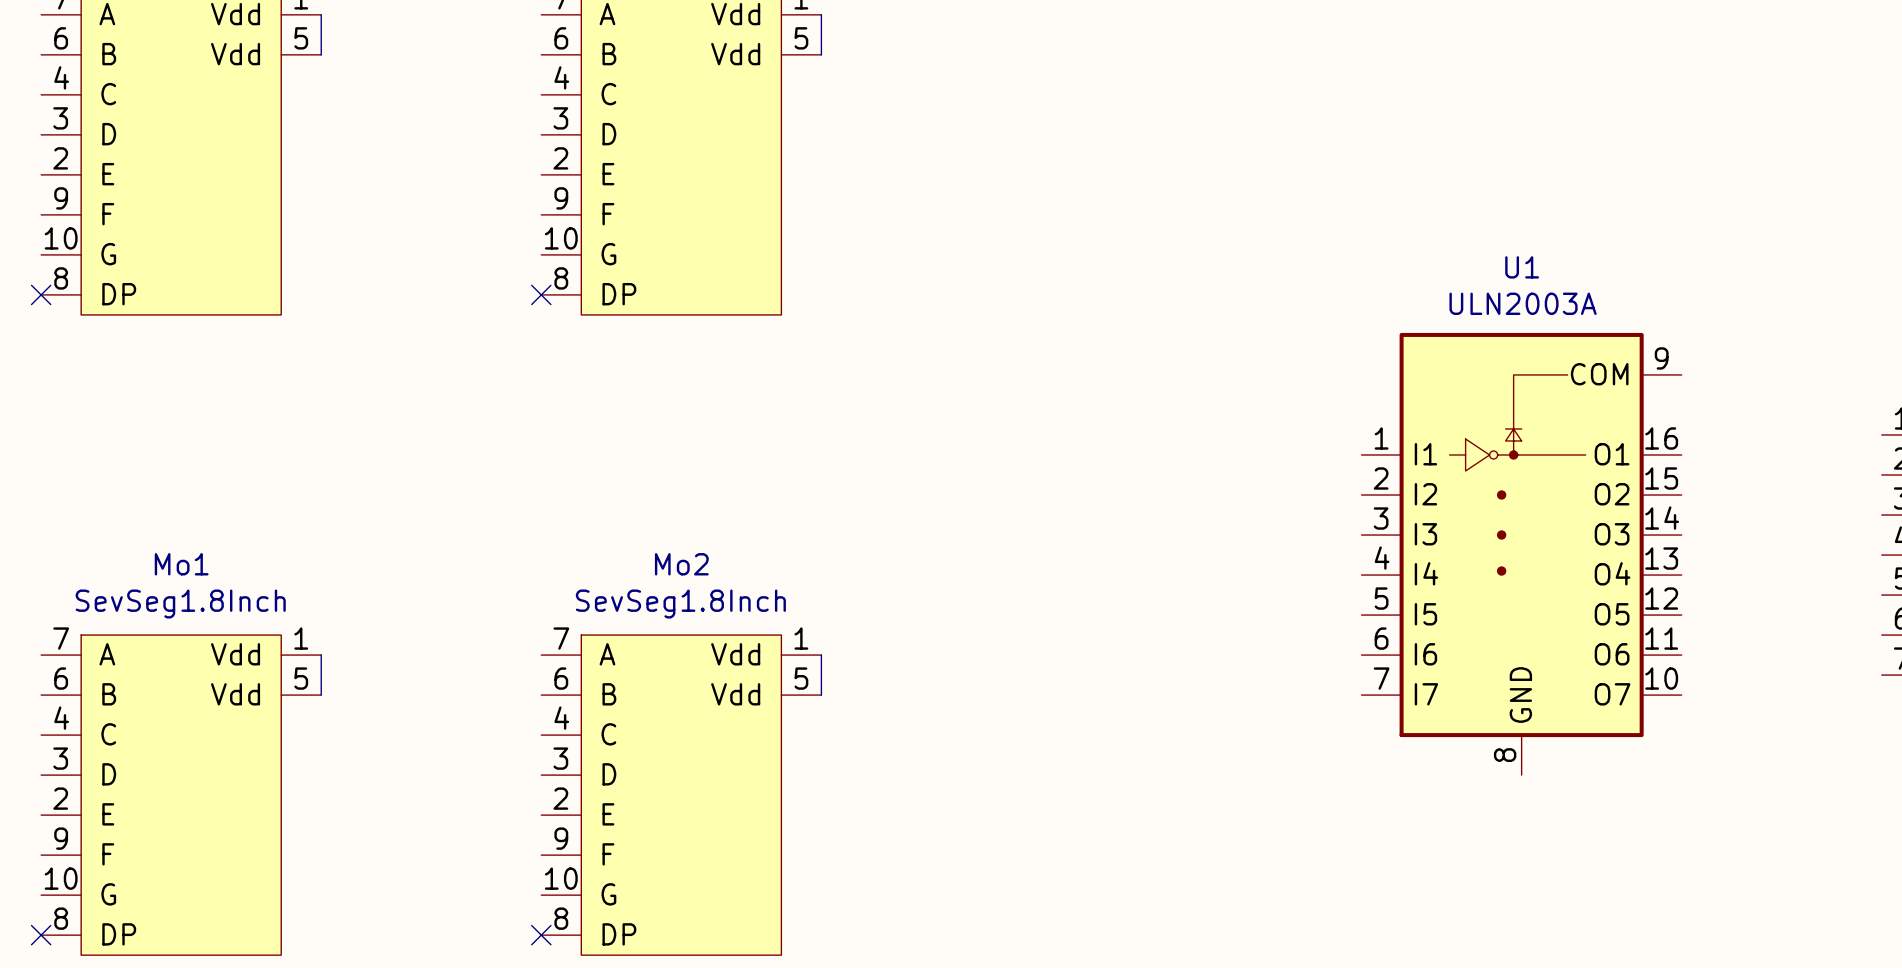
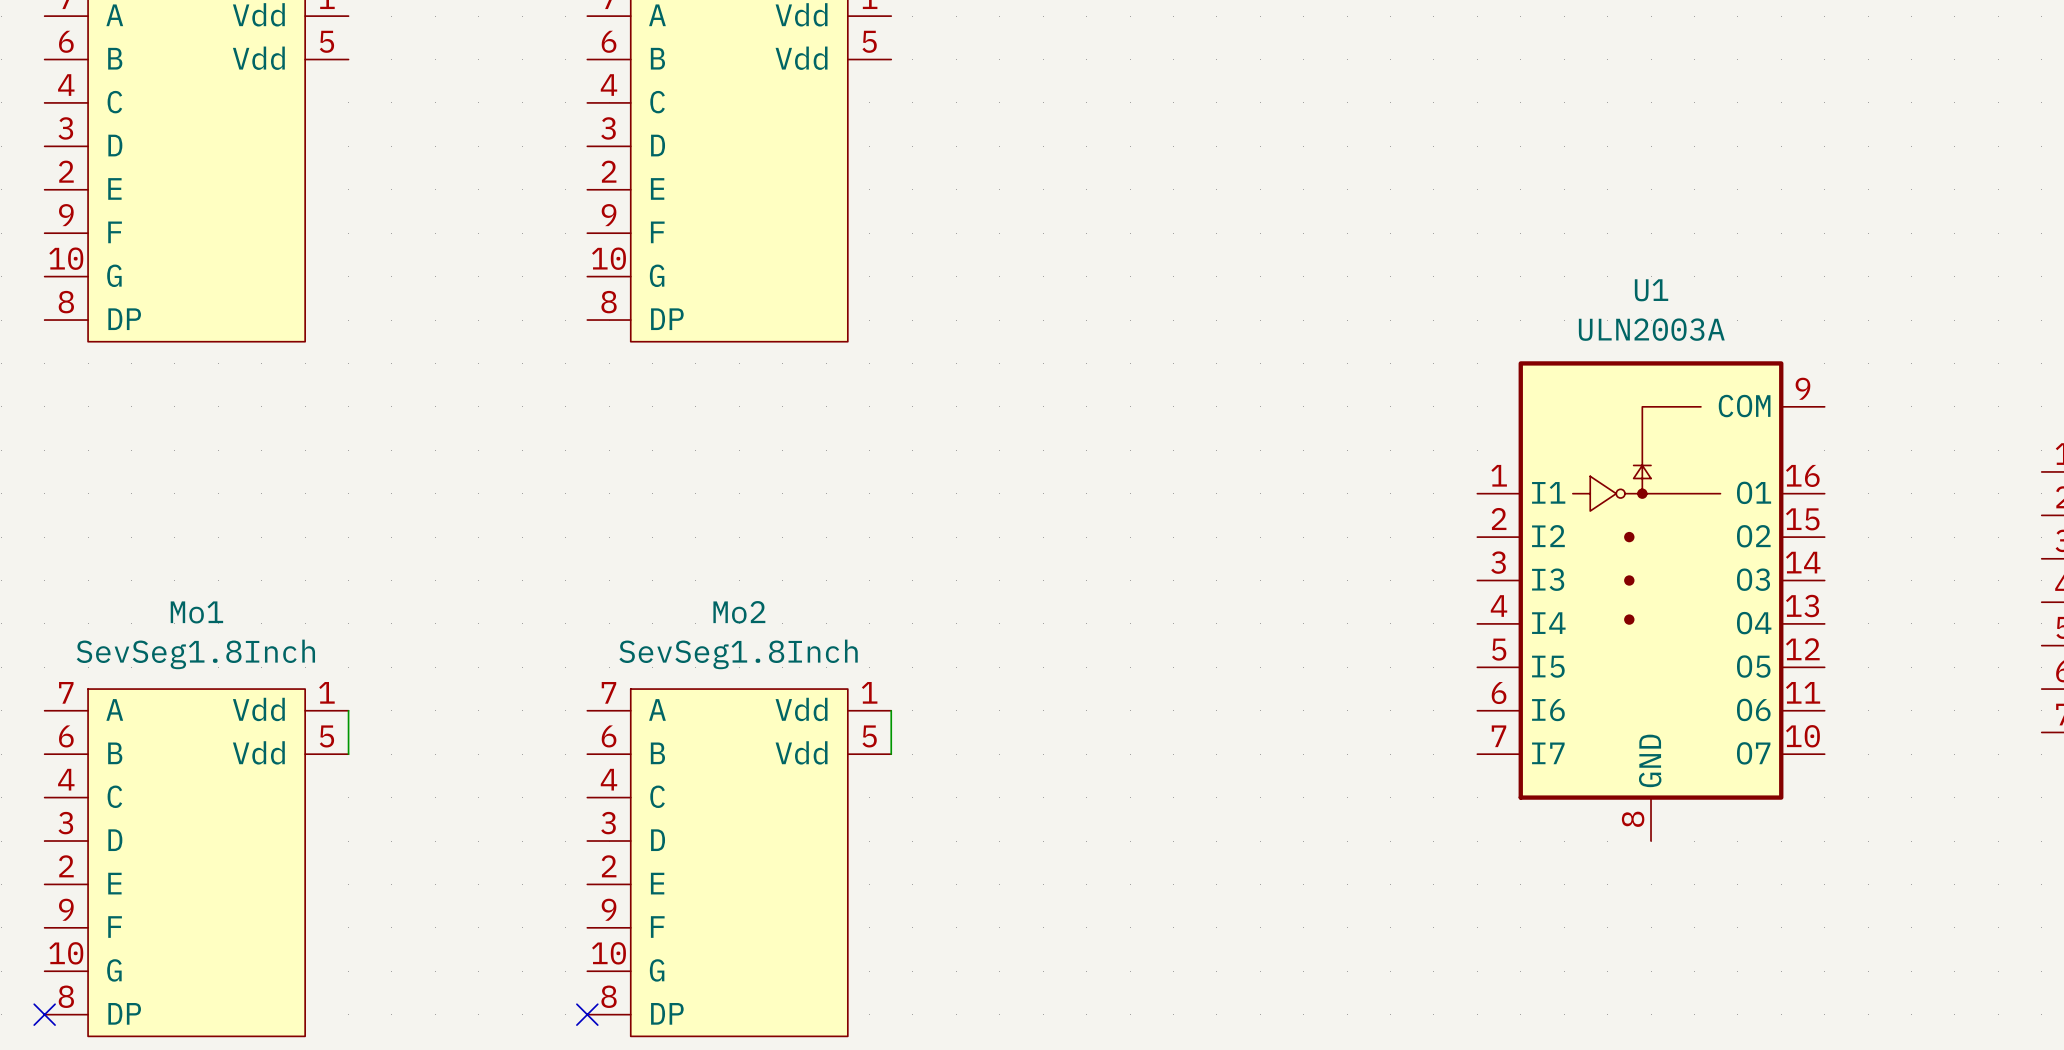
wire: (321, 14) (321, 54) -> none
wire: (821, 14) (821, 54) -> none
no-connect mark: (41, 294) -> none
no-connect mark: (541, 294) -> none

